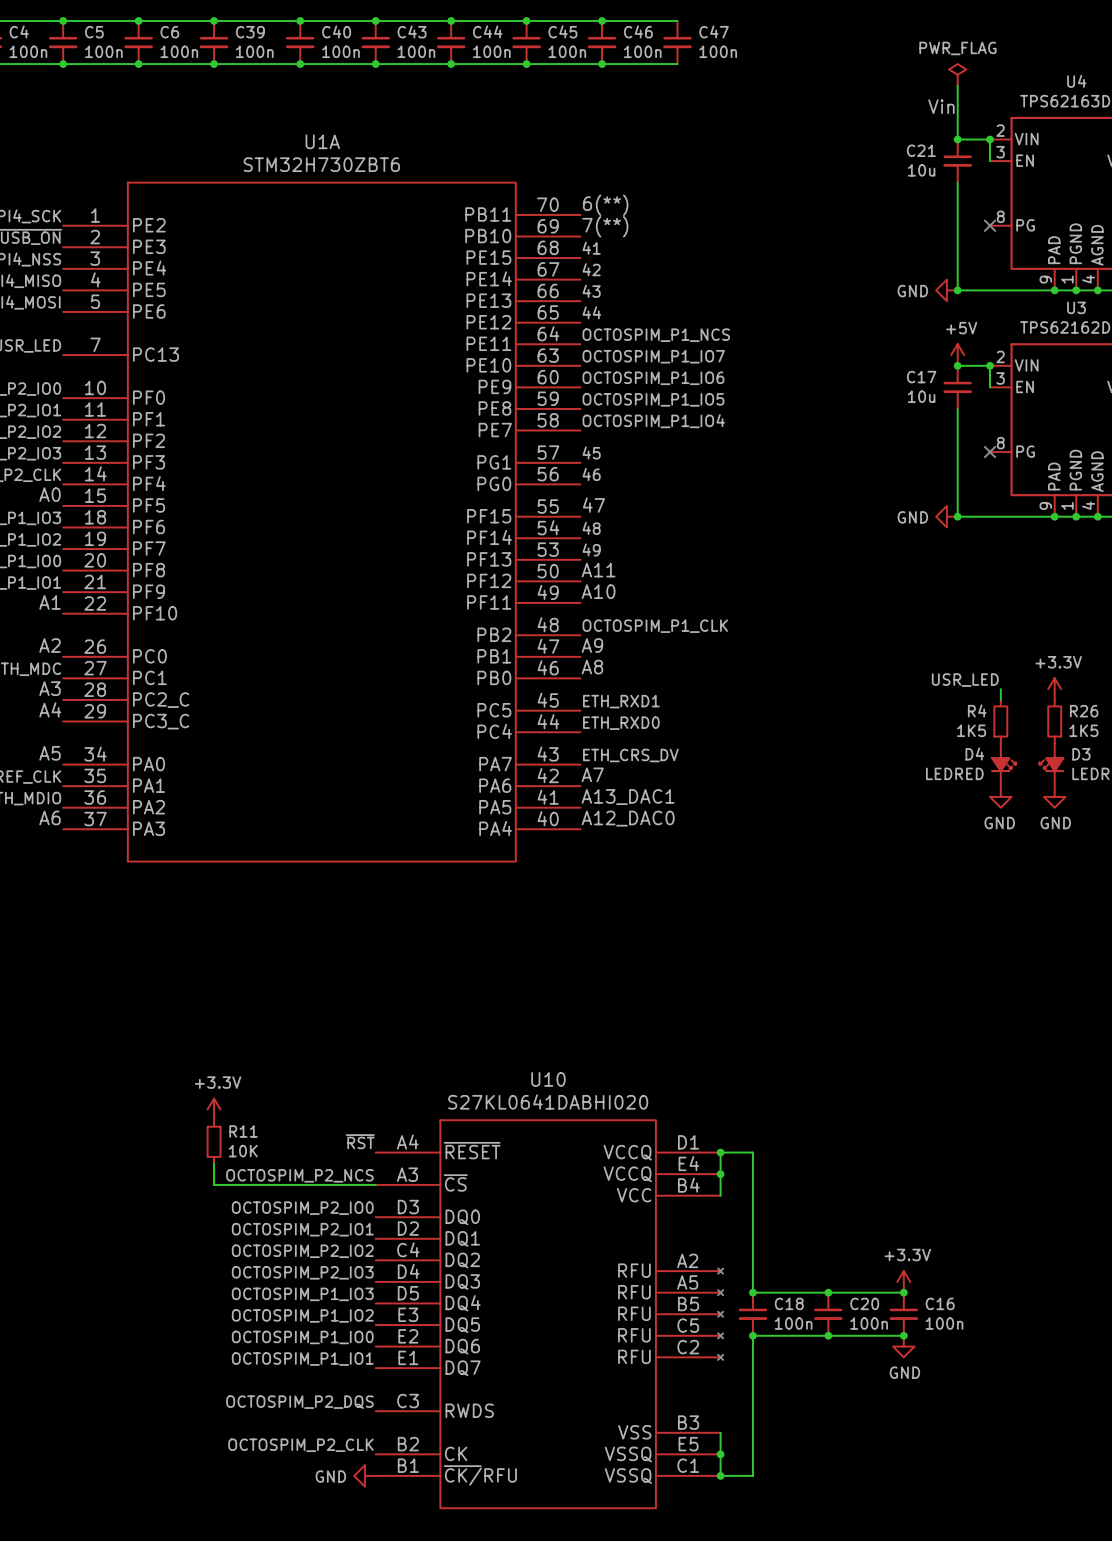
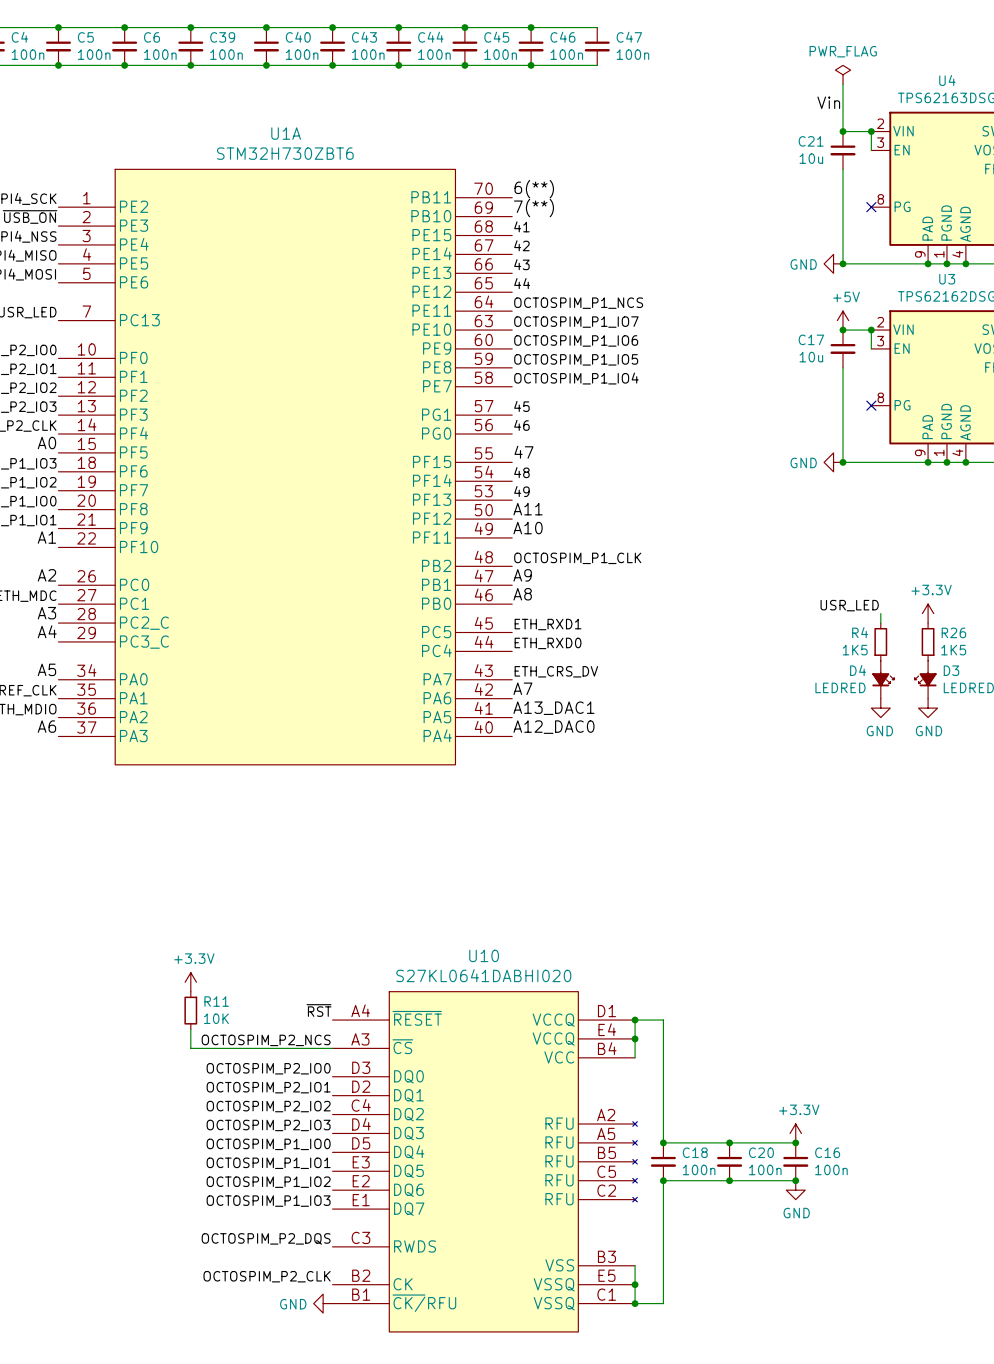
label: OCTOSPIM_P1_IO3 (302, 1294) -> OCTOSPIM_P1_IO0 (268, 1144)
label: OCTOSPIM_P1_IO2 (302, 1315) -> OCTOSPIM_P1_IO1 (268, 1163)
label: OCTOSPIM_P1_IO0 (302, 1337) -> OCTOSPIM_P1_IO2 (268, 1182)
label: OCTOSPIM_P1_IO1 (302, 1359) -> OCTOSPIM_P1_IO3 (268, 1201)

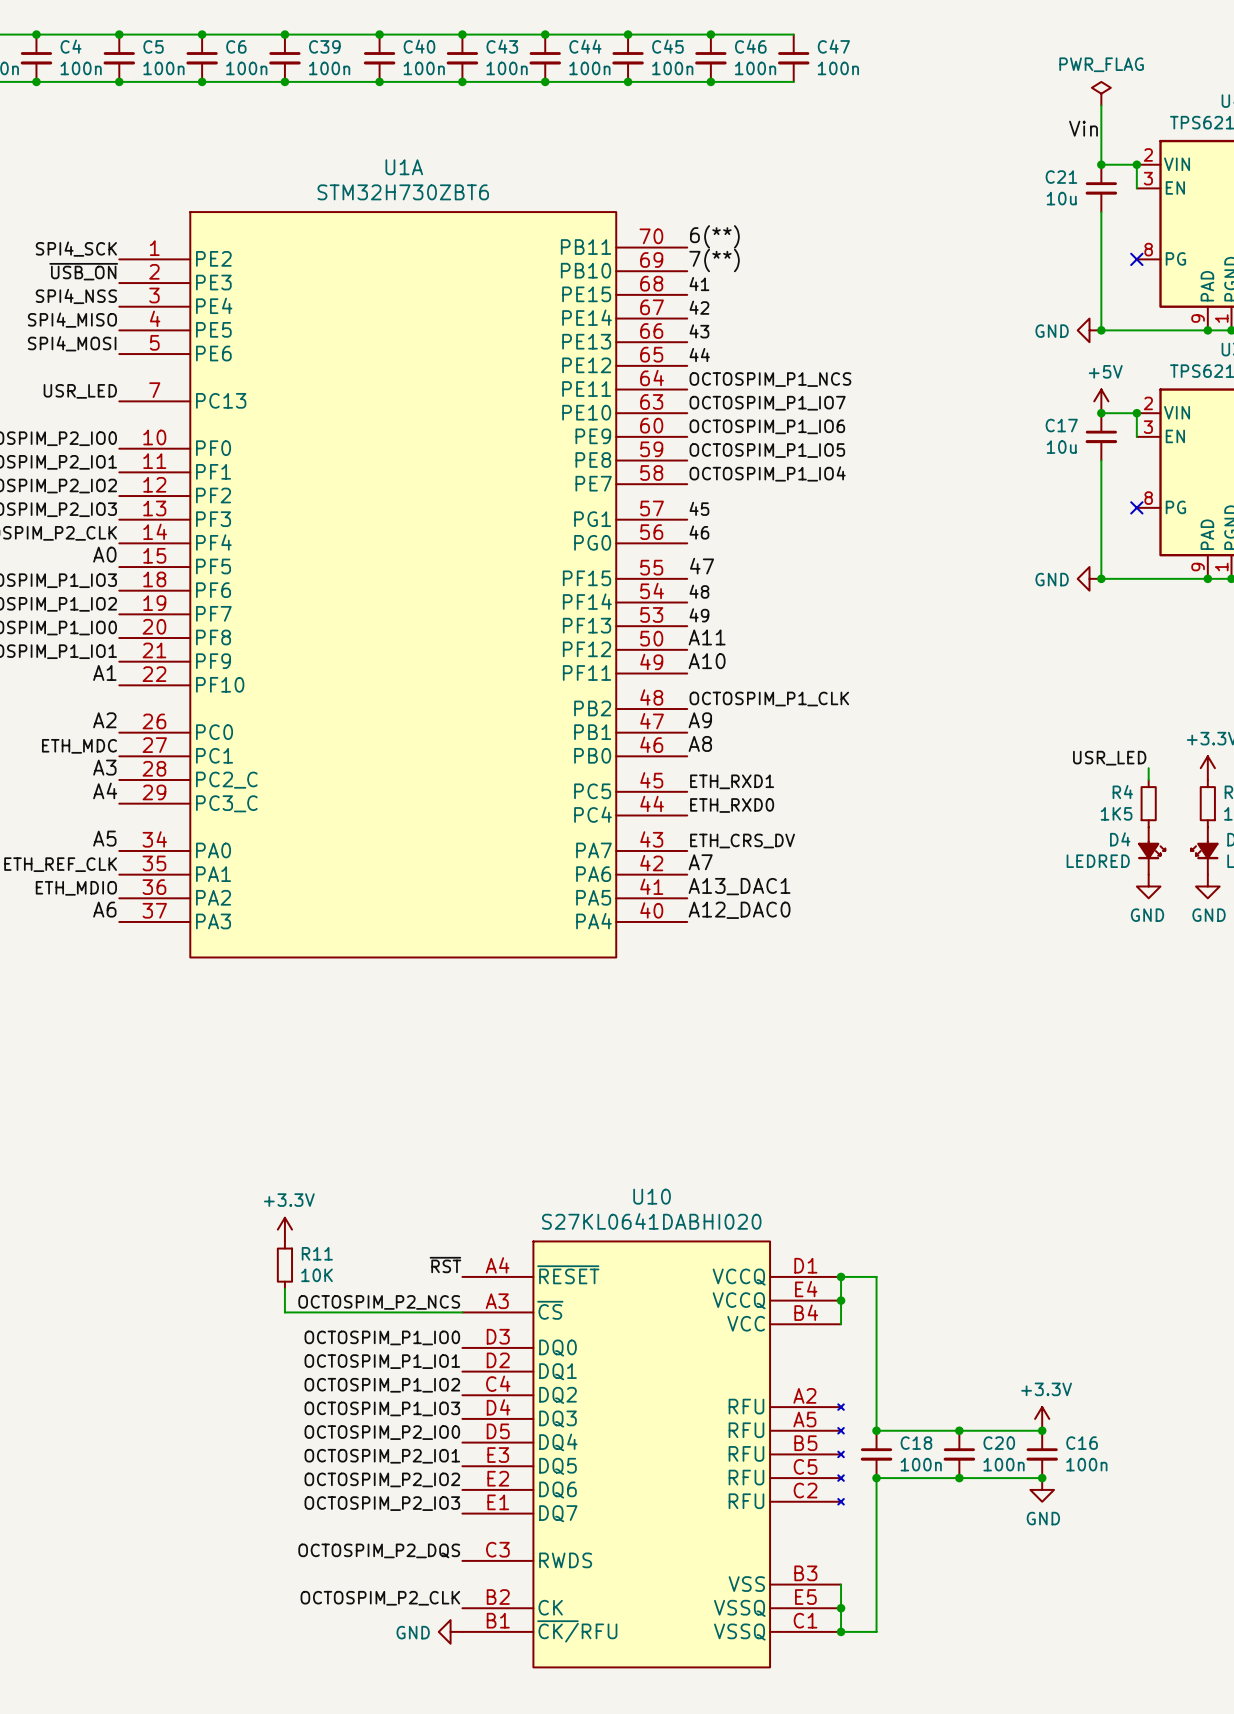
label: OCTOSPIM_P2_IO0 (268, 1068) -> OCTOSPIM_P1_IO0 (382, 1337)
label: OCTOSPIM_P2_IO1 (268, 1087) -> OCTOSPIM_P1_IO1 (382, 1361)
label: OCTOSPIM_P2_IO2 (268, 1106) -> OCTOSPIM_P1_IO2 (382, 1385)
label: OCTOSPIM_P2_IO3 (268, 1125) -> OCTOSPIM_P1_IO3 (382, 1408)
label: OCTOSPIM_P1_IO0 (268, 1144) -> OCTOSPIM_P2_IO0 (382, 1432)
label: OCTOSPIM_P1_IO1 (268, 1163) -> OCTOSPIM_P2_IO1 (382, 1456)
label: OCTOSPIM_P1_IO2 (268, 1182) -> OCTOSPIM_P2_IO2 (382, 1479)
label: OCTOSPIM_P1_IO3 (268, 1201) -> OCTOSPIM_P2_IO3 (382, 1503)

